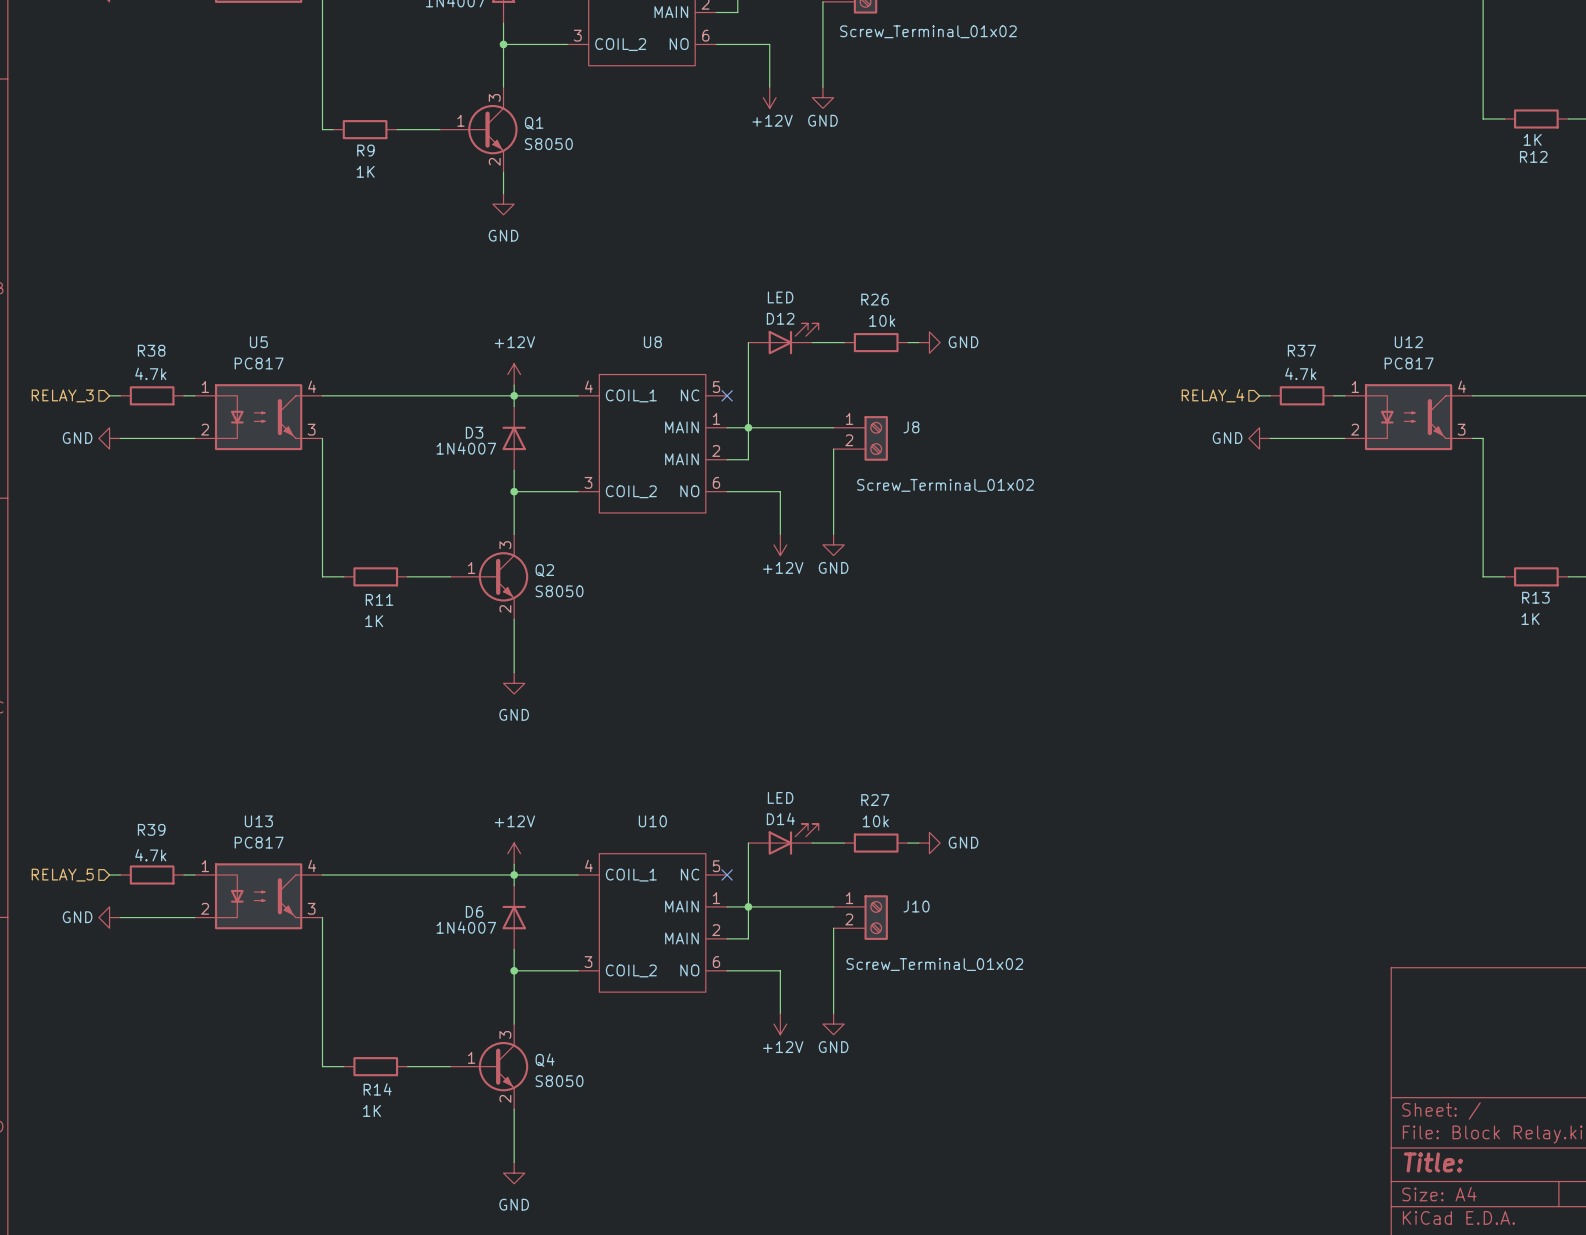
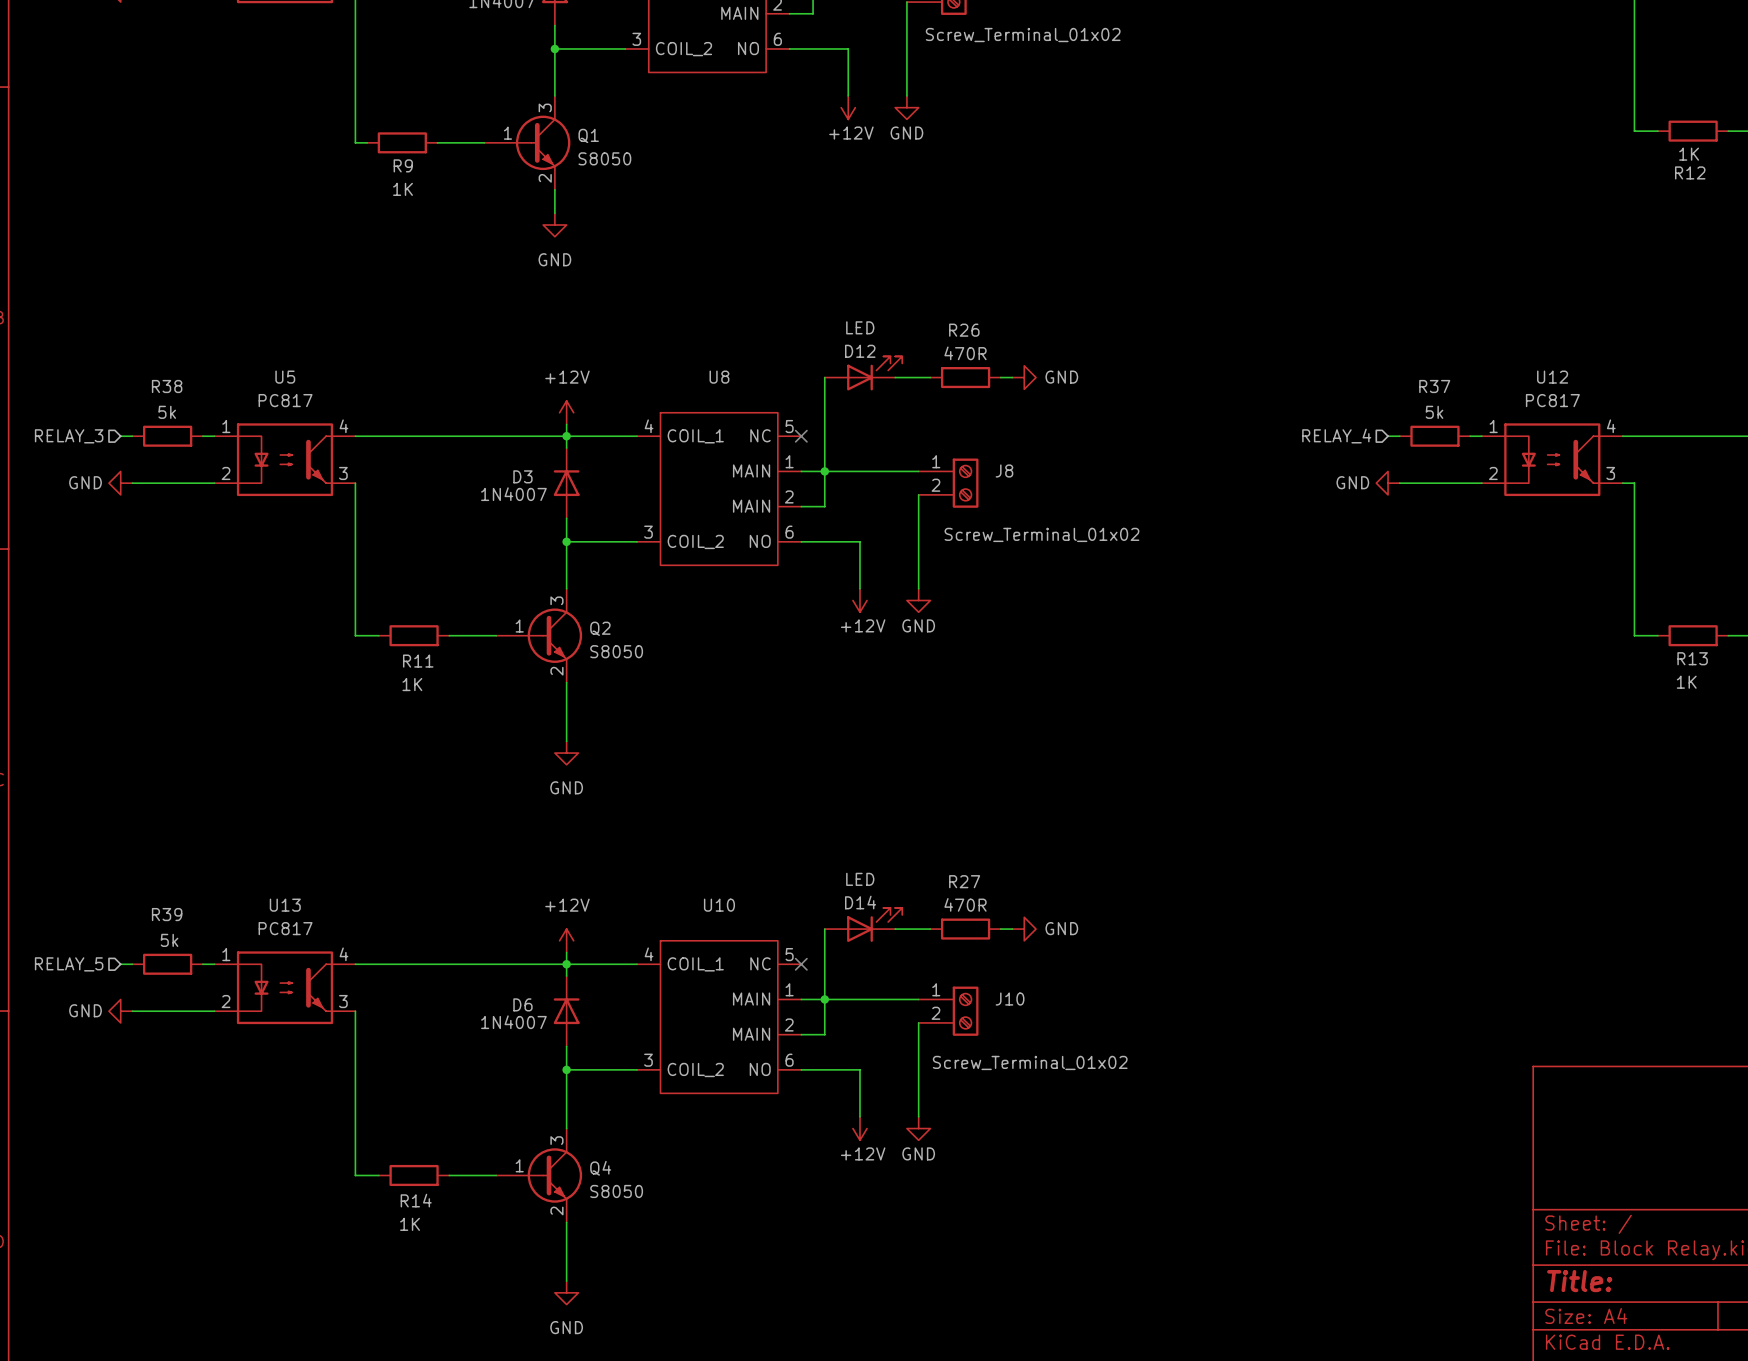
R26 value: 10k (882, 320) -> 470R (965, 353)
R38 value: 4.7k (150, 373) -> 5k (167, 412)
R37 value: 4.7k (1300, 373) -> 5k (1434, 412)
R27 value: 10k (875, 821) -> 470R (965, 904)
R39 value: 4.7k (150, 855) -> 5k (169, 940)

